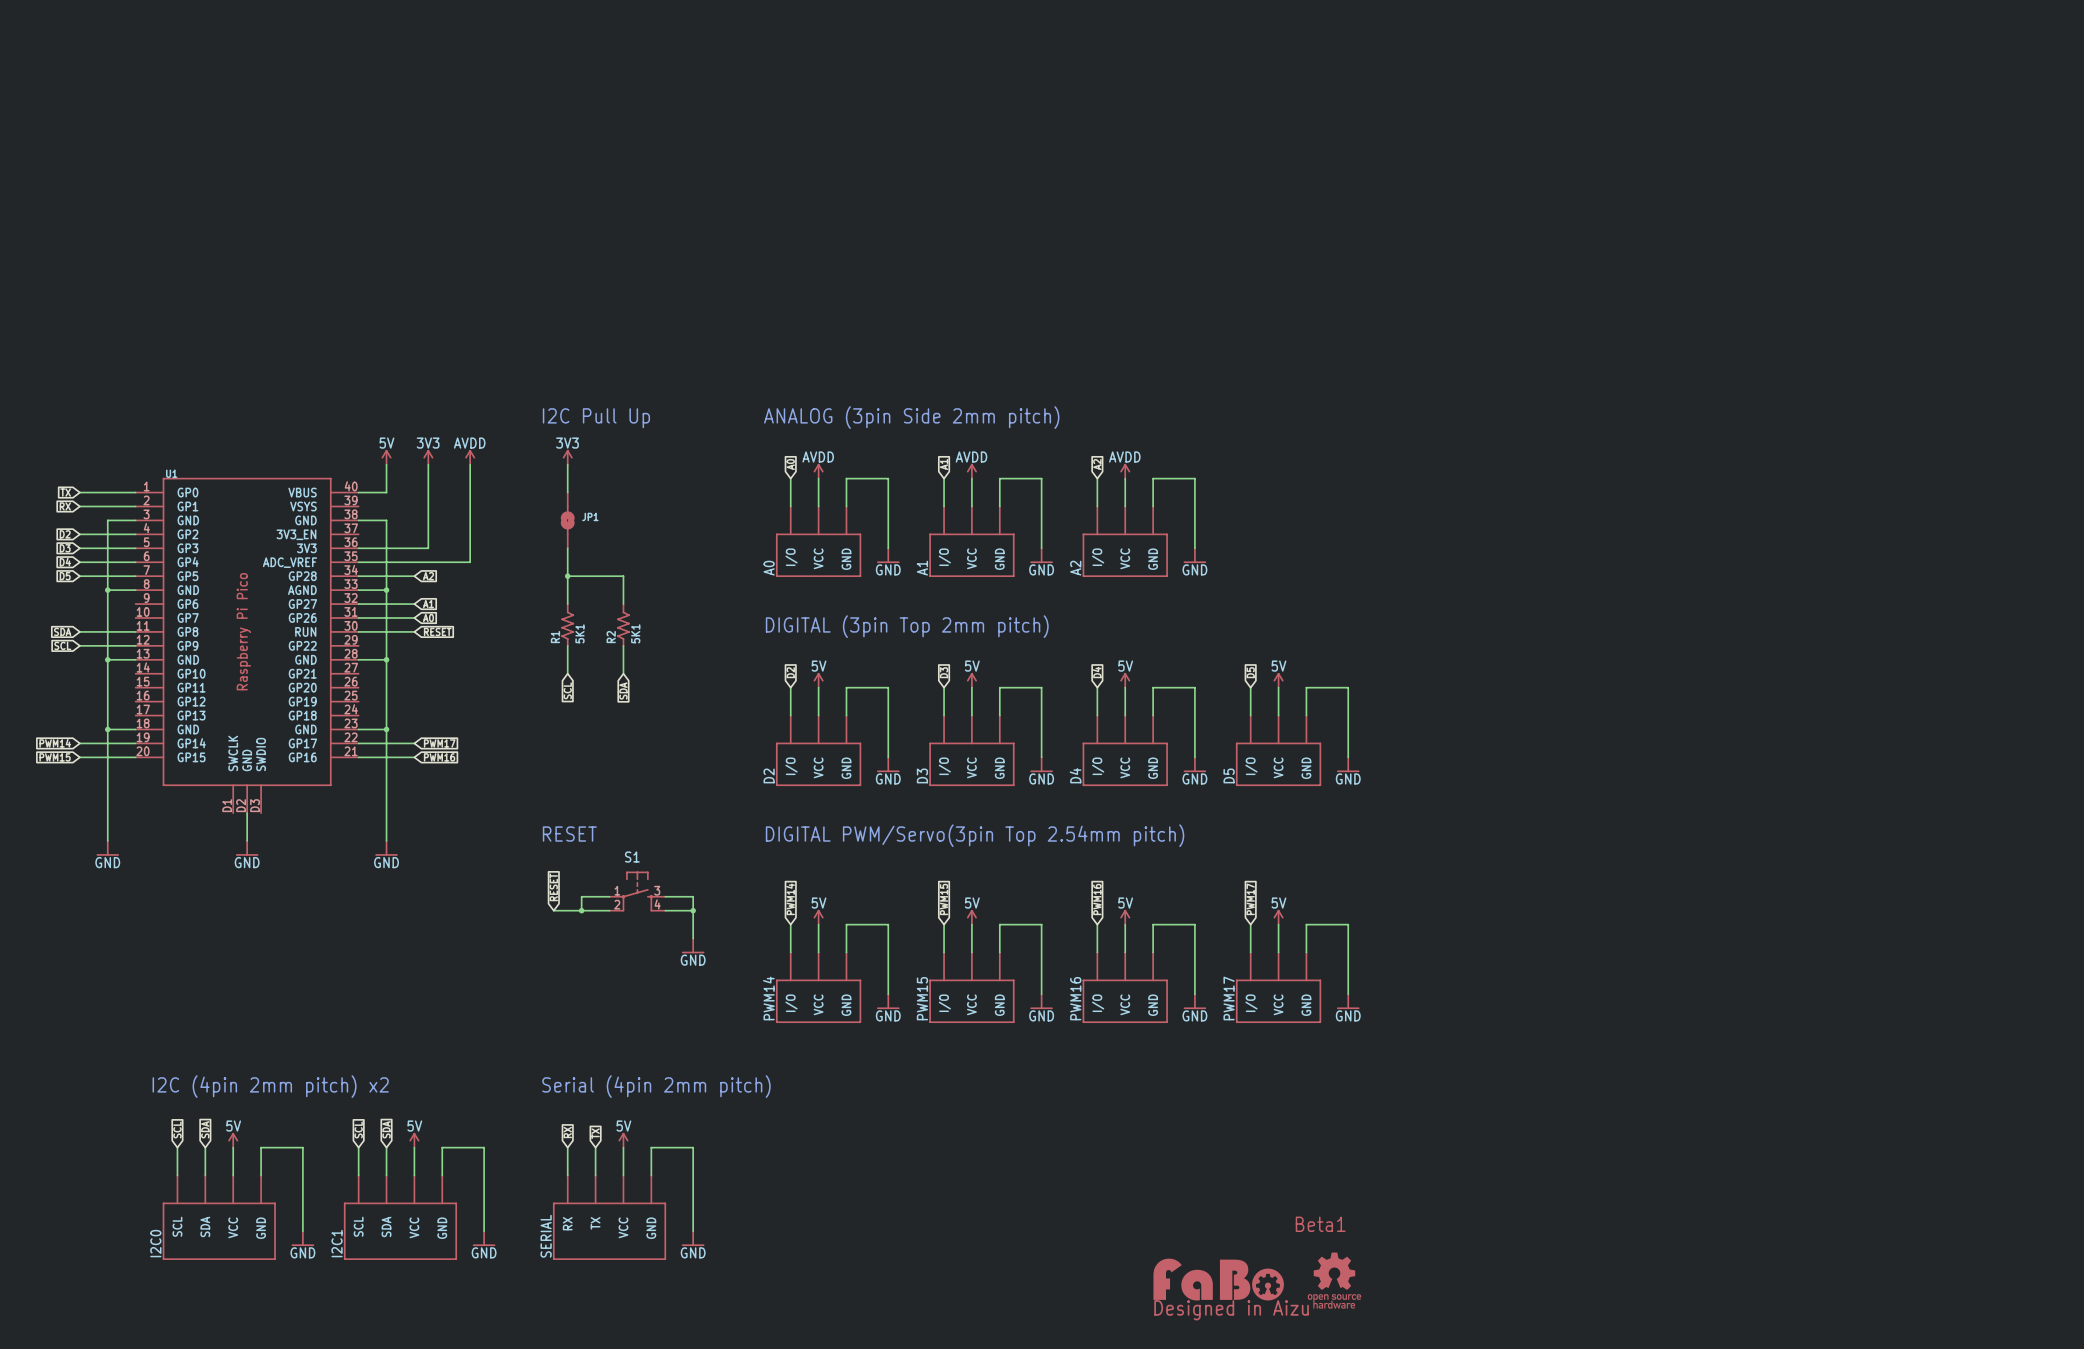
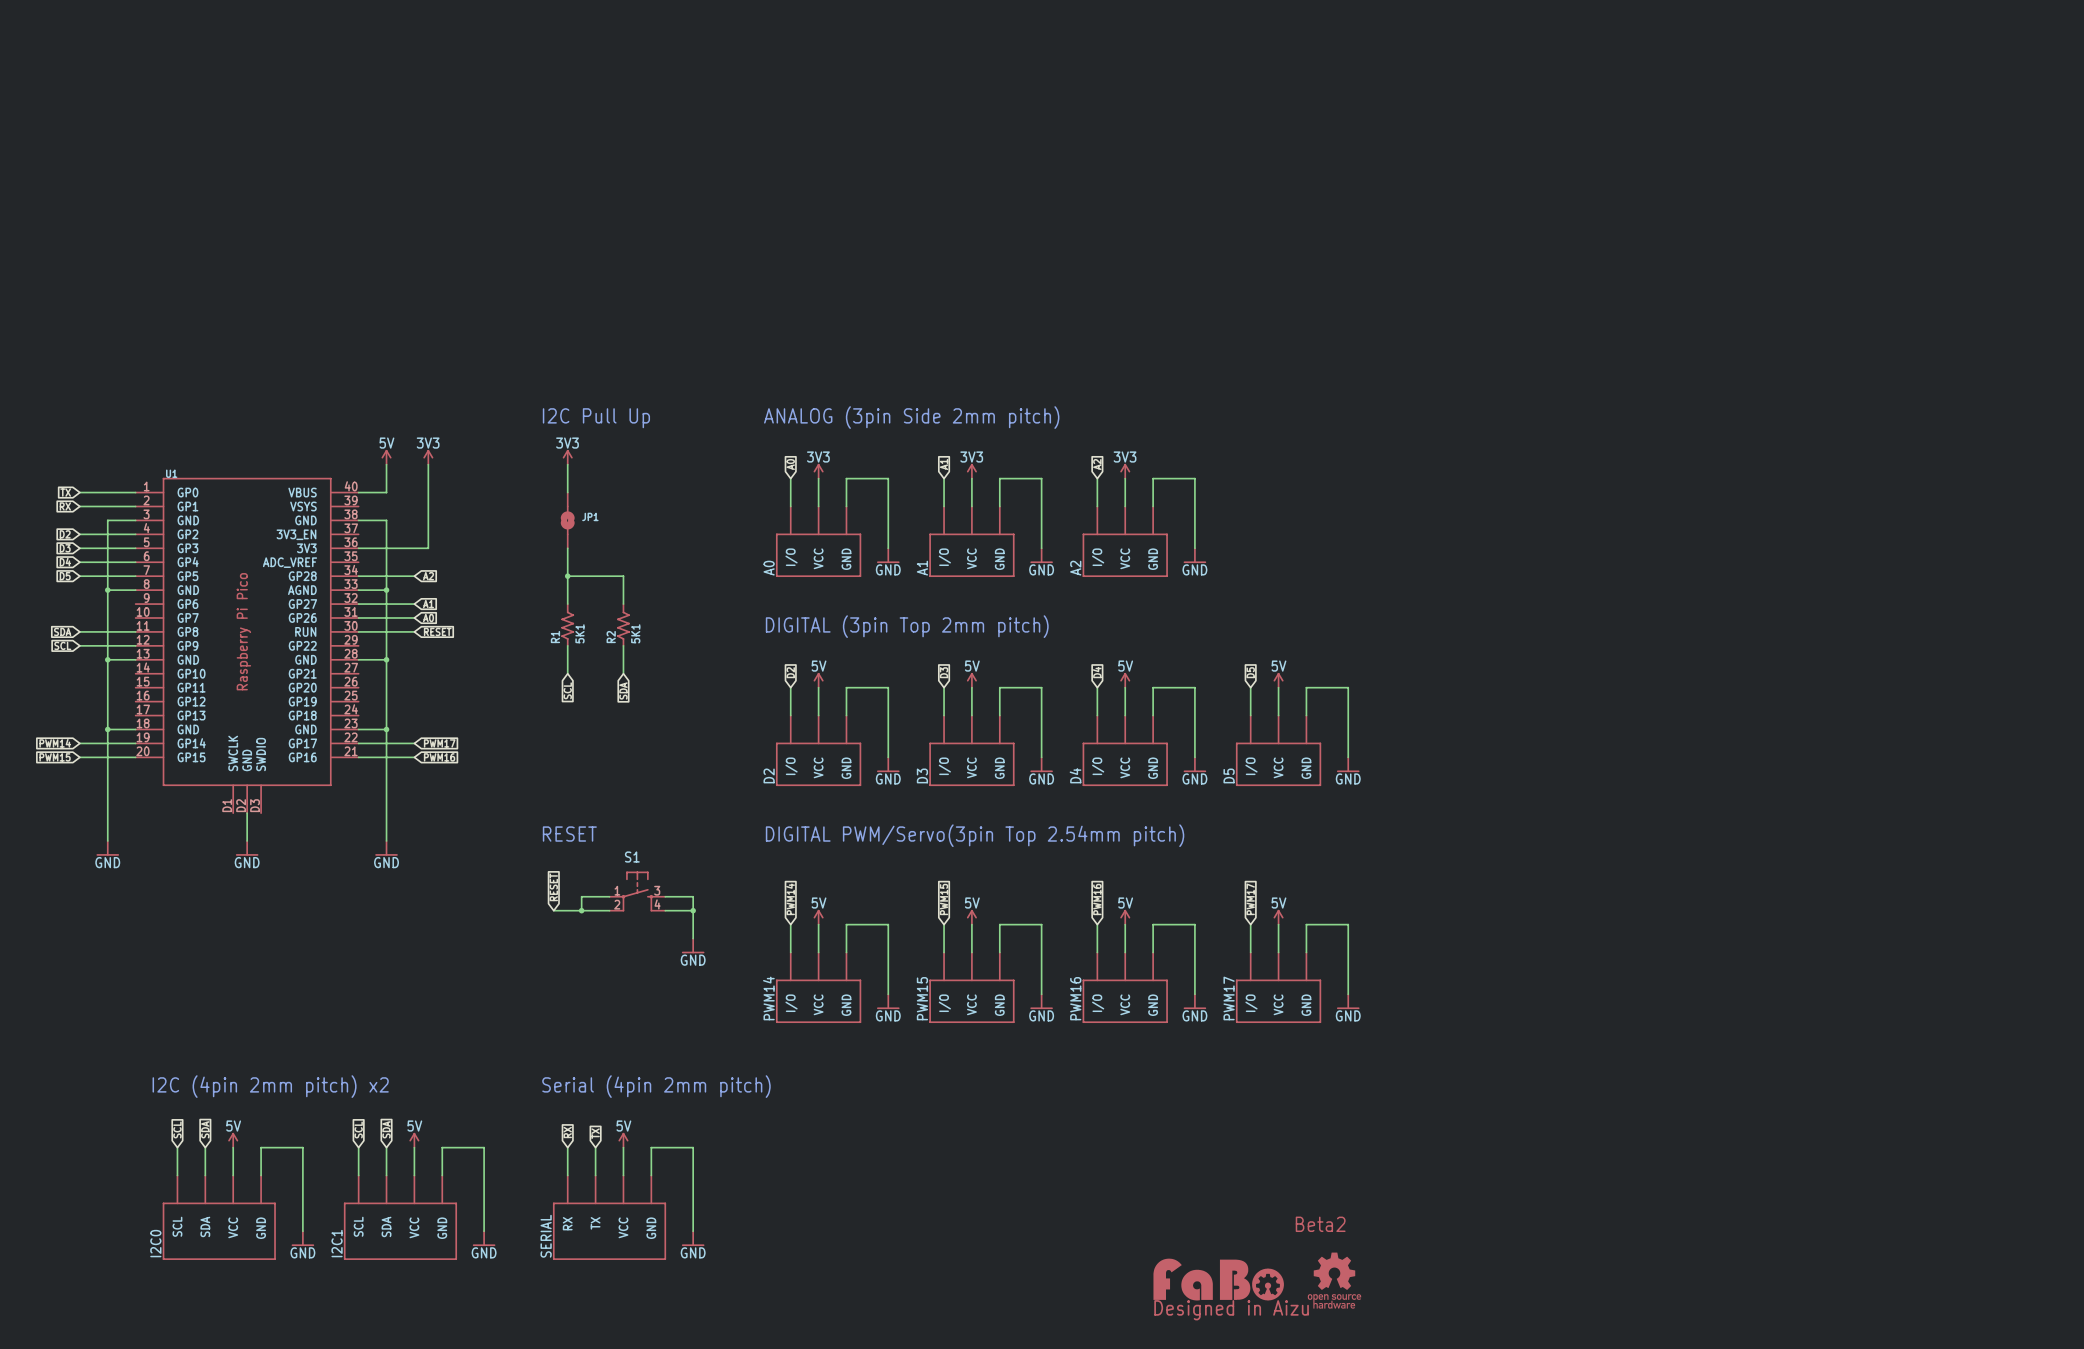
power symbol: AVDD (470, 457) -> none
wire: (470, 464) (470, 562) (358, 562) -> none
power symbol: AVDD (818, 471) -> 3V3 (818, 471)
power symbol: AVDD (971, 471) -> 3V3 (971, 471)
power symbol: AVDD (1125, 471) -> 3V3 (1125, 471)
text: Beta1 (1320, 1224) -> Beta2 (1320, 1224)

